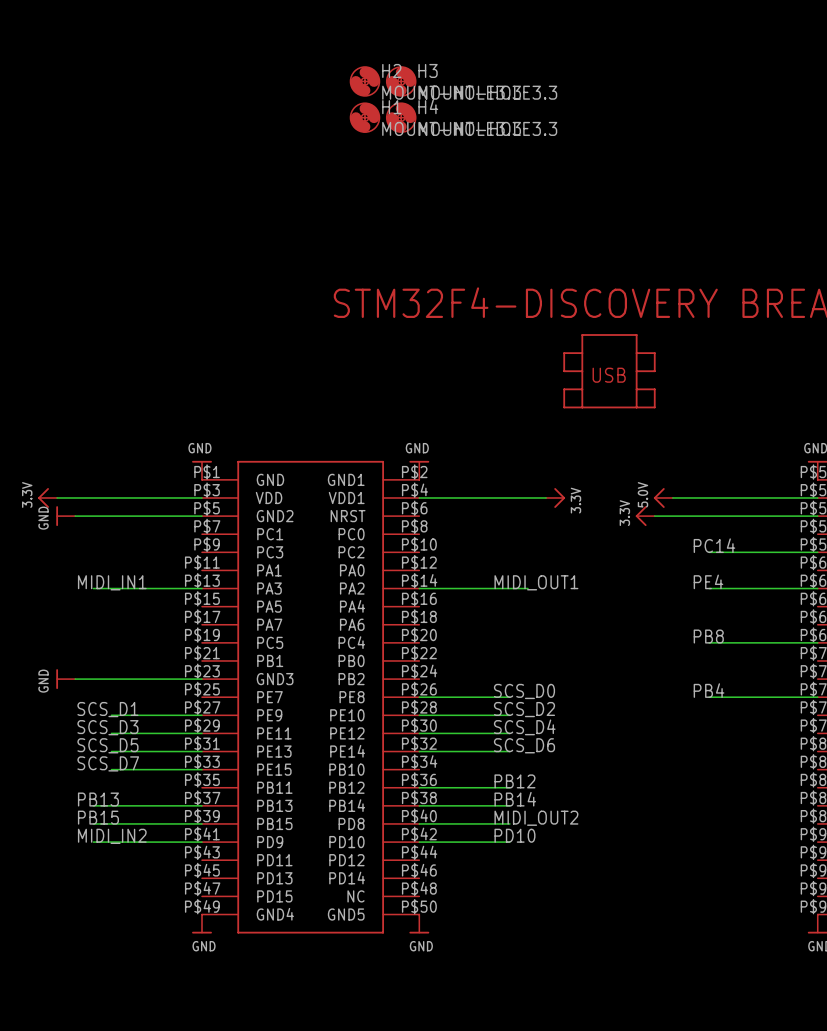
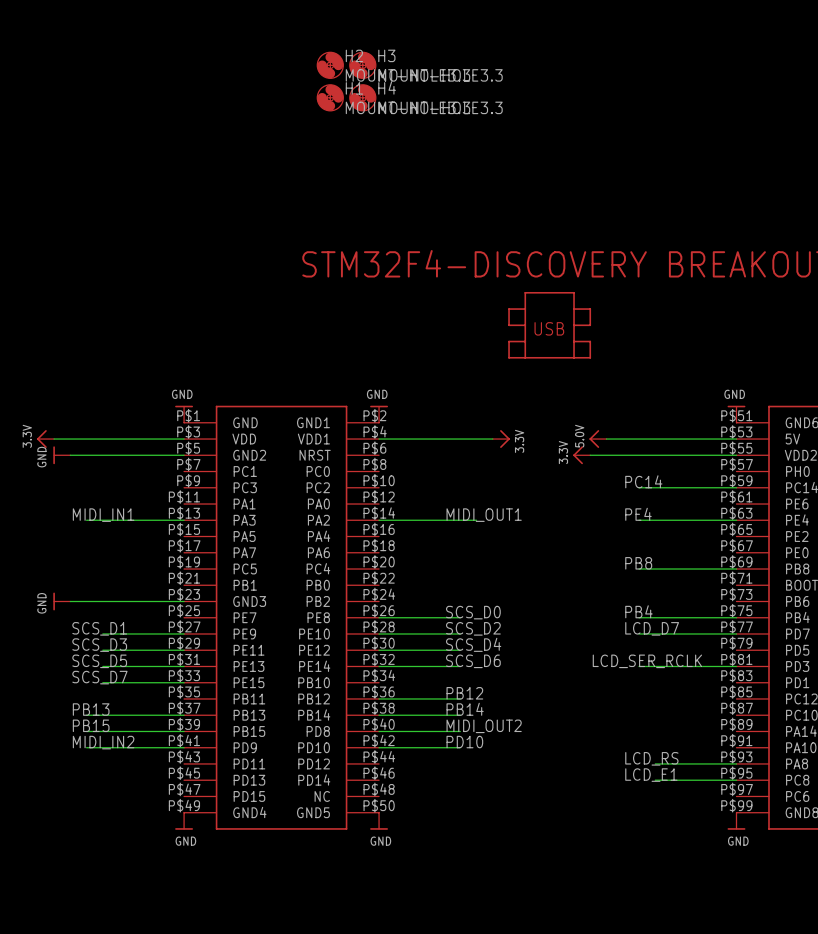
label: none -> LCD_D7 (652, 628)
wire: none -> (639, 633) (736, 633)
label: none -> LCD_SER_RCLK (647, 661)
wire: none -> (639, 666) (736, 666)
label: none -> LCD_RS (651, 758)
wire: none -> (655, 763) (736, 763)
label: none -> LCD_E1 (651, 775)
wire: none -> (655, 780) (736, 780)

